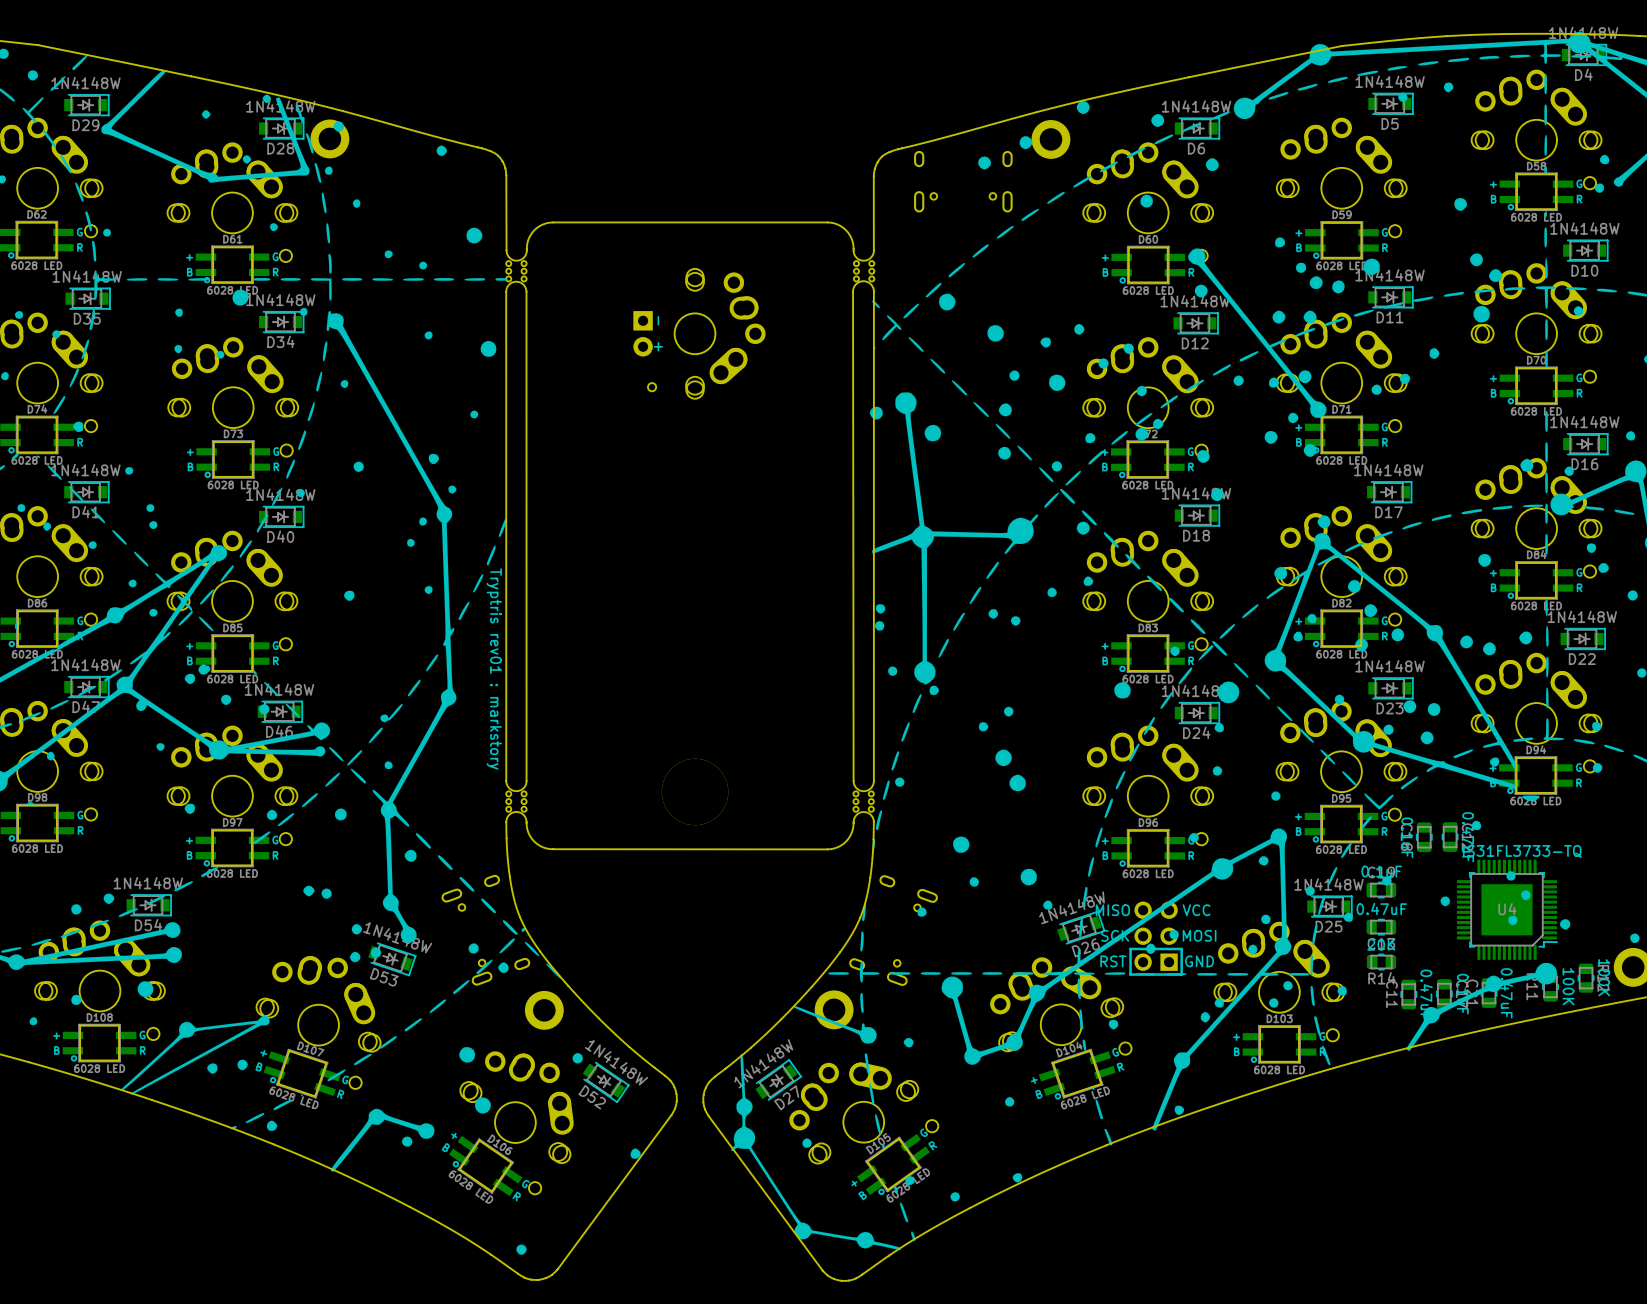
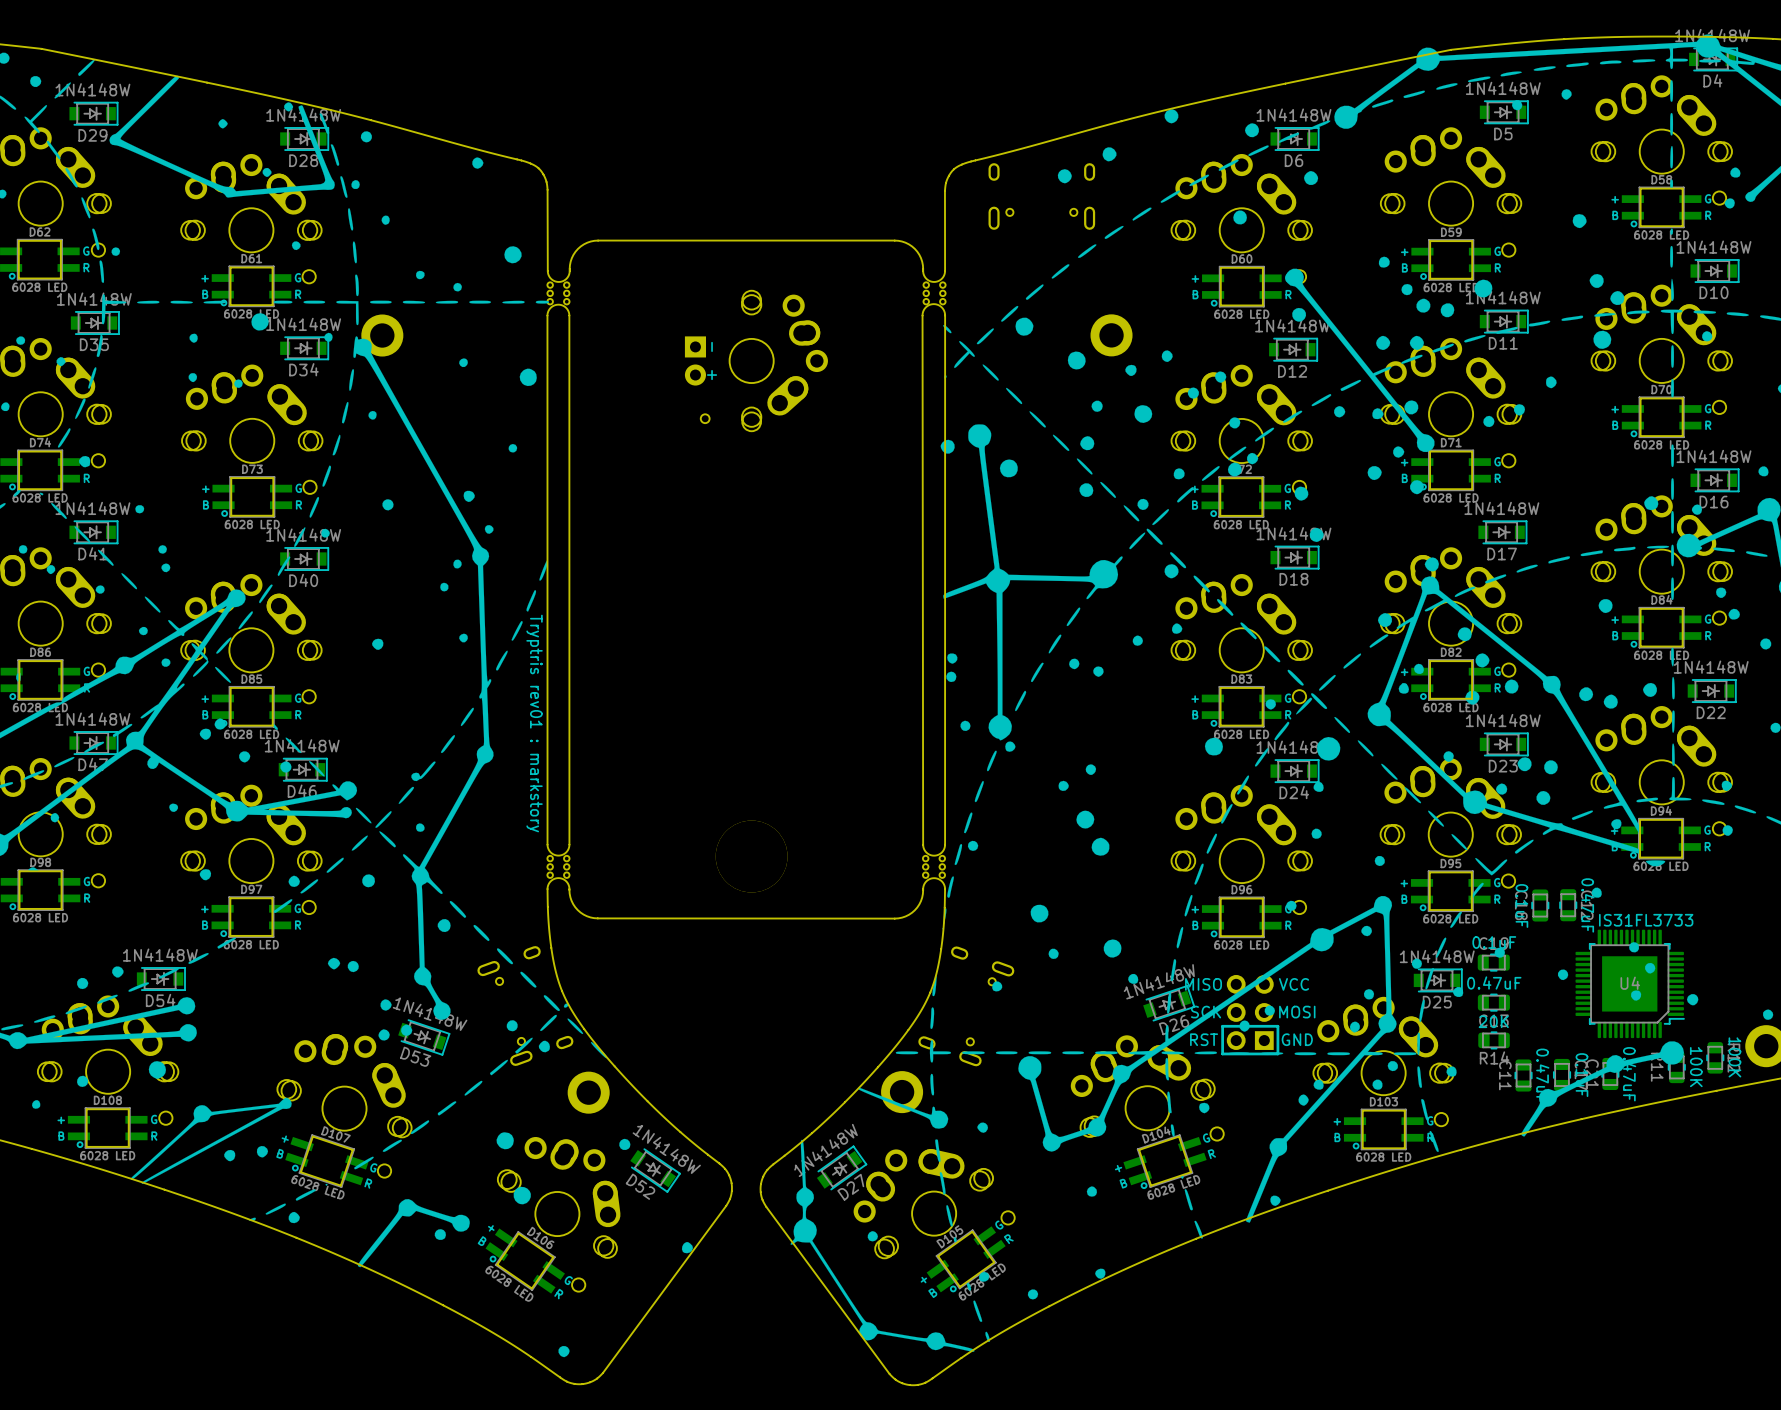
part position: (329, 138) -> (382, 335)
part position: (1050, 139) -> (1111, 335)
U4 value: IS31FL3733-TQ (1522, 851) -> IS31FL3733 (1646, 920)

